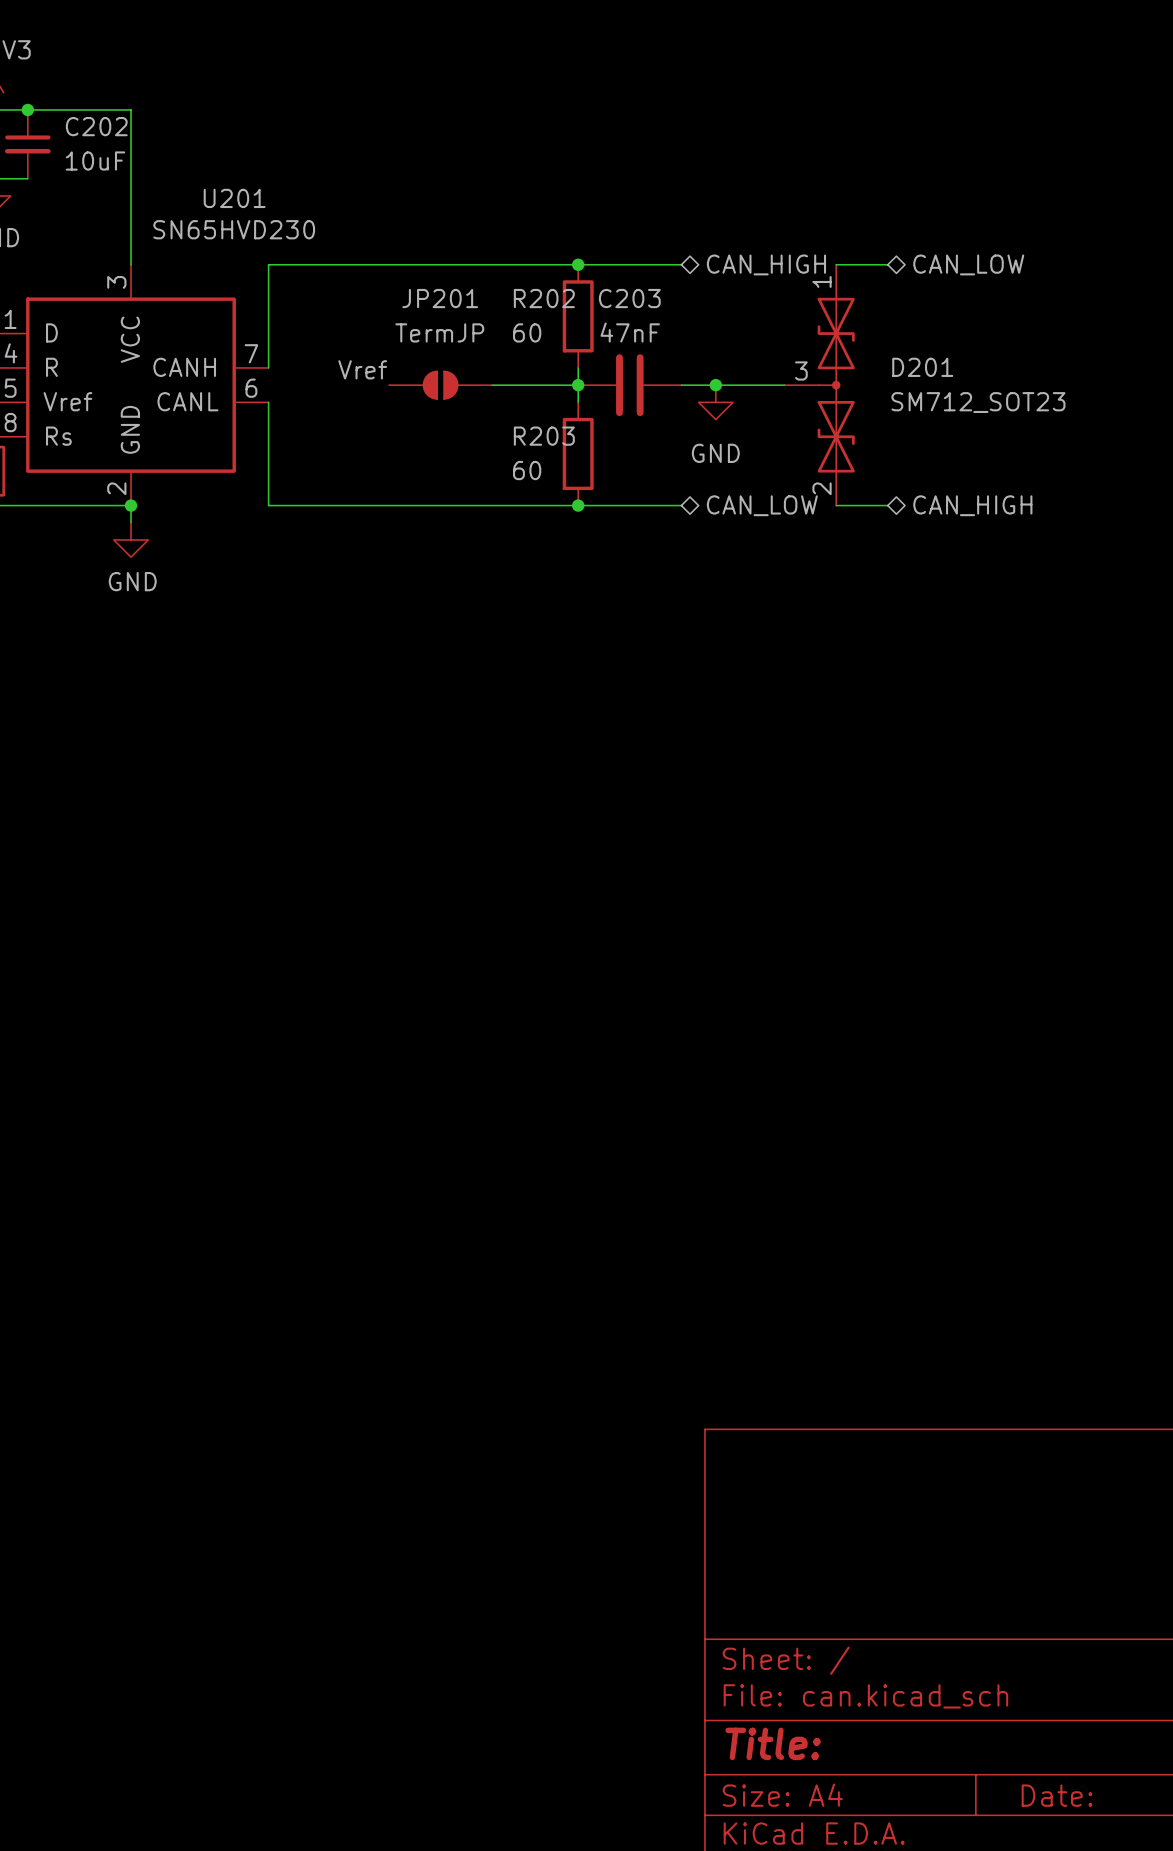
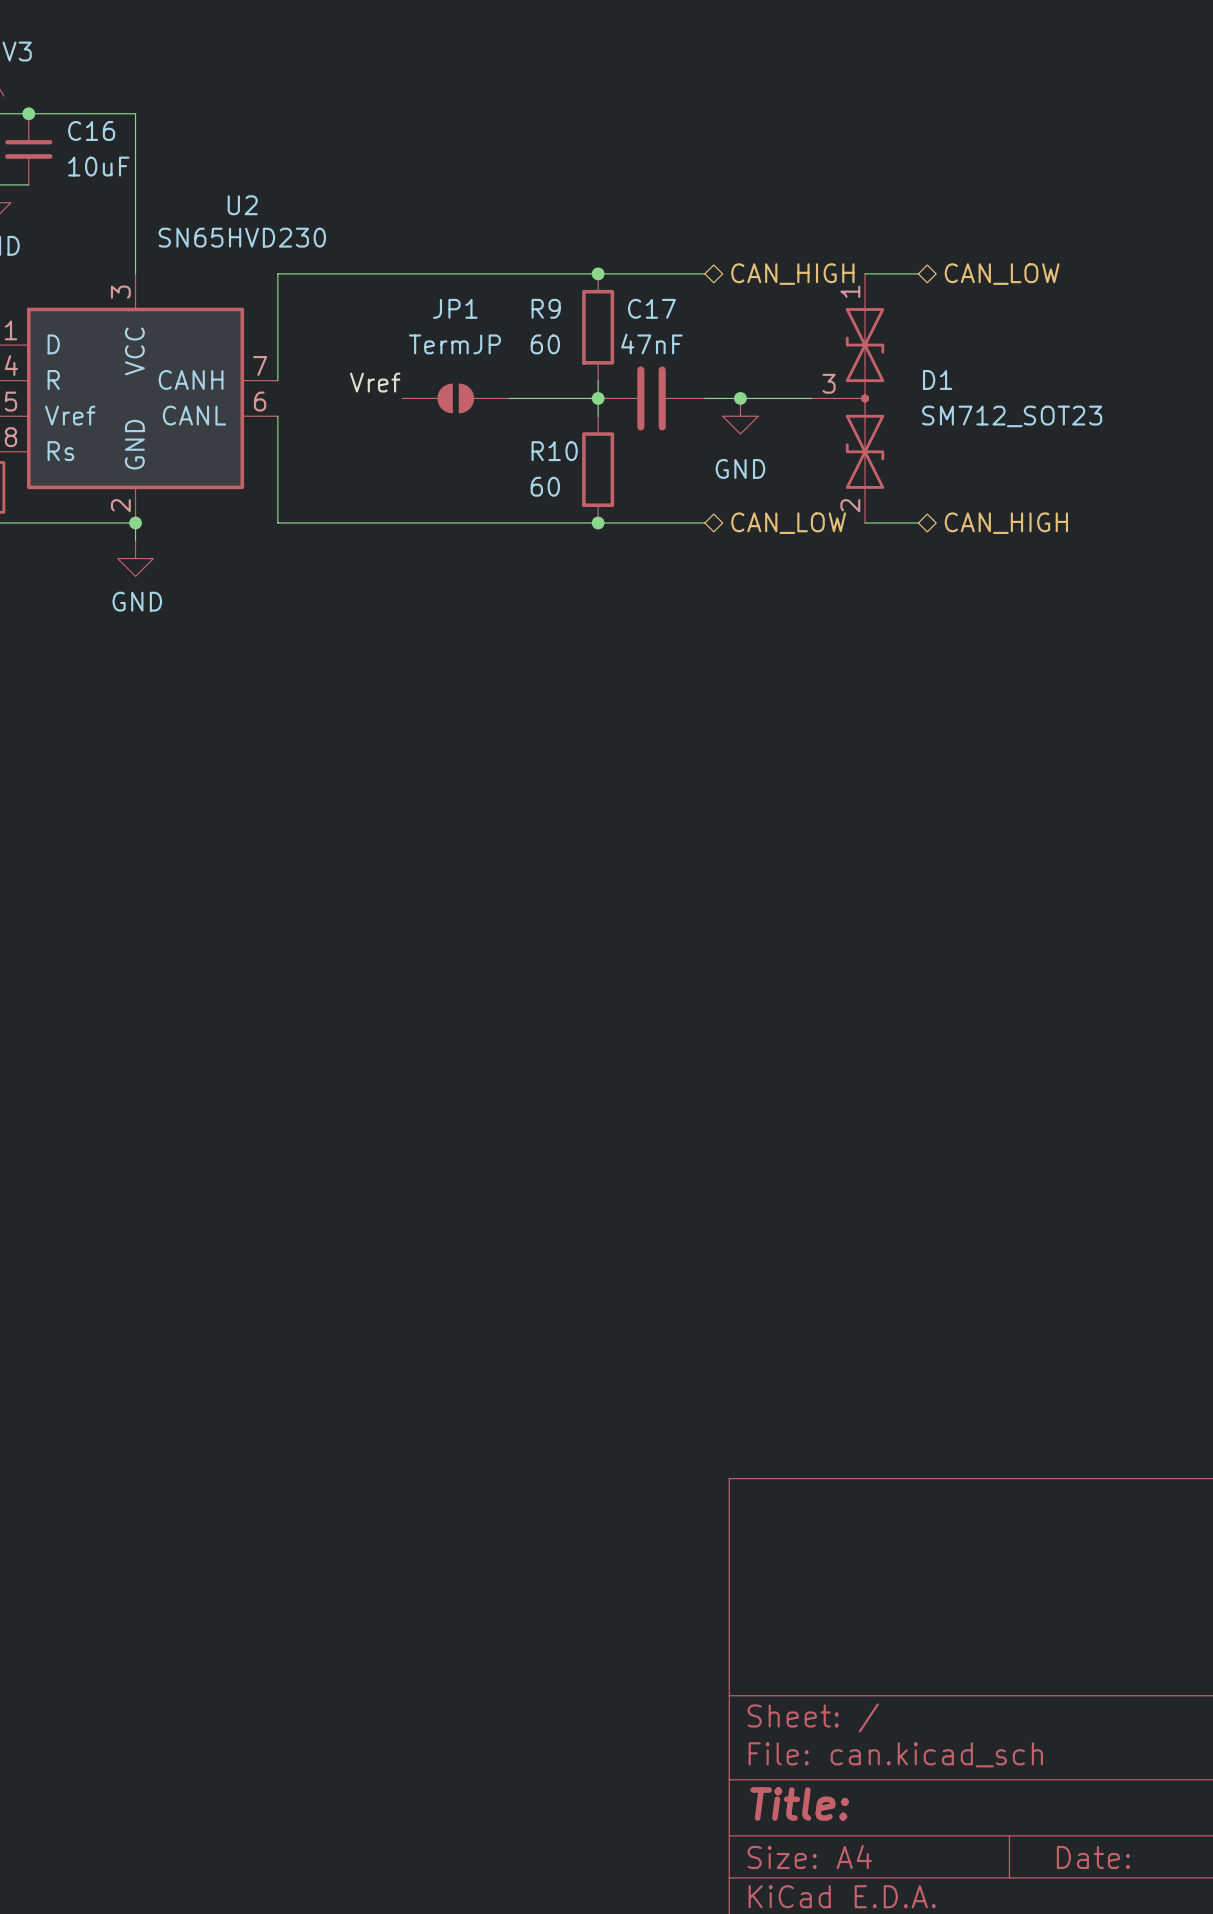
C202 name: C202 (96, 126) -> C16 (91, 130)
U201 name: U201 (234, 198) -> U2 (242, 205)
JP201 name: JP201 (440, 298) -> JP1 (455, 308)
R202 name: R202 (544, 298) -> R9 (546, 308)
C203 name: C203 (629, 298) -> C17 (651, 308)
D201 name: D201 (922, 367) -> D1 (937, 379)
R203 name: R203 (544, 436) -> R10 (554, 451)

